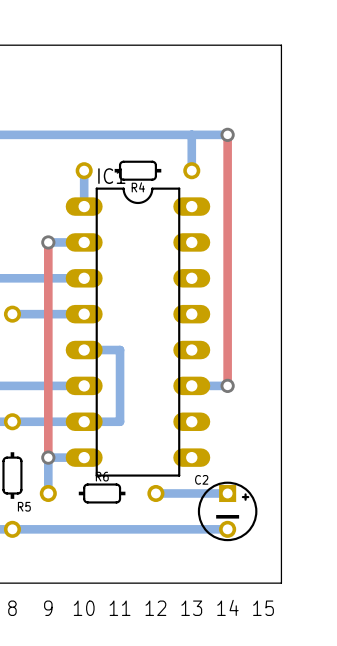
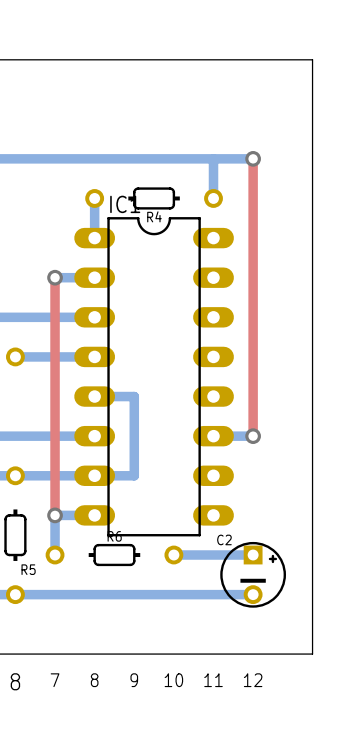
text: 14 (227, 607) -> 12 (253, 680)
text: 9 (48, 608) -> 7 (55, 680)
text: 10 (84, 608) -> 8 (94, 680)
text: 11 (120, 608) -> 9 (134, 680)
text: 12 (155, 608) -> 10 (173, 680)
text: 13 (191, 608) -> 11 (213, 680)
text: 15 (263, 608) -> none

